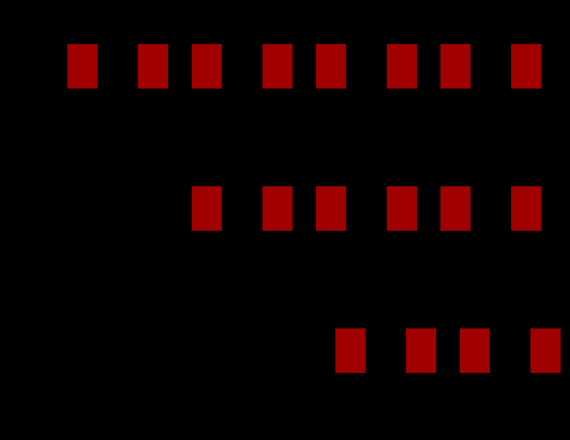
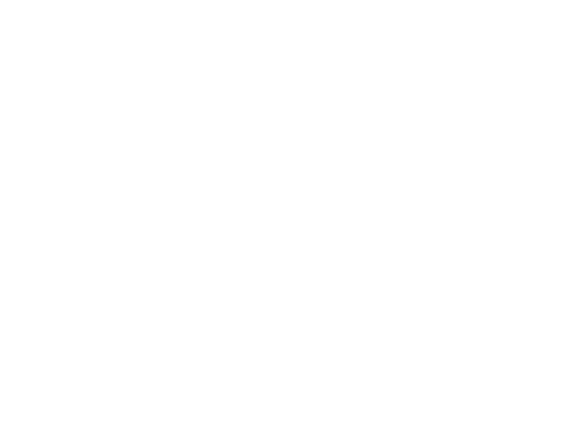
part: (117, 66) -> none
part: (242, 66) -> none
part: (366, 66) -> none
part: (490, 66) -> none
part: (242, 208) -> none
part: (366, 208) -> none
part: (490, 208) -> none
part: (385, 350) -> none
part: (510, 350) -> none

